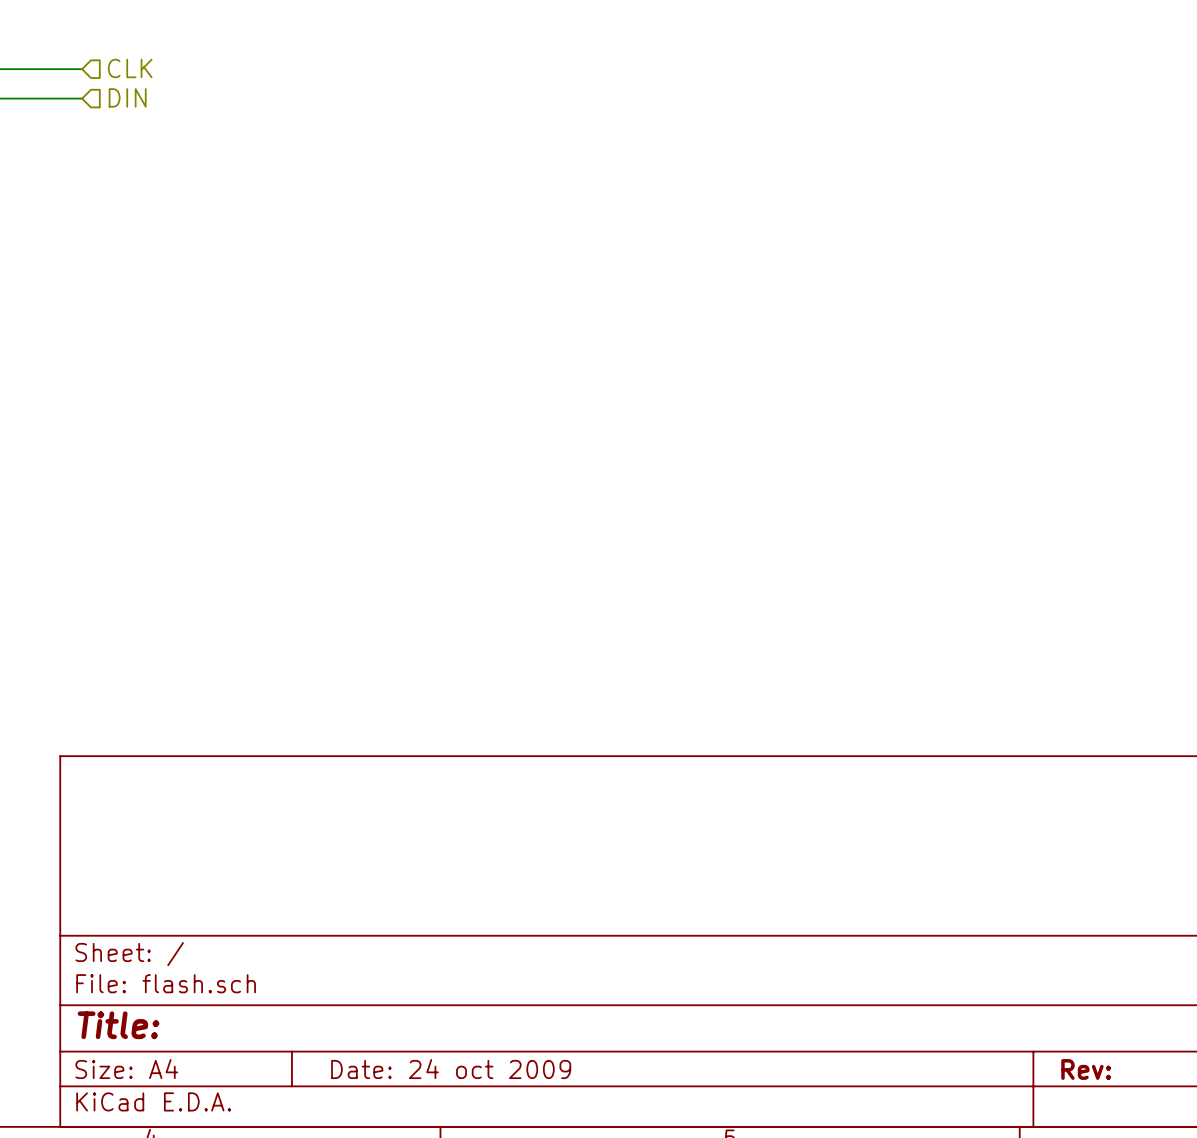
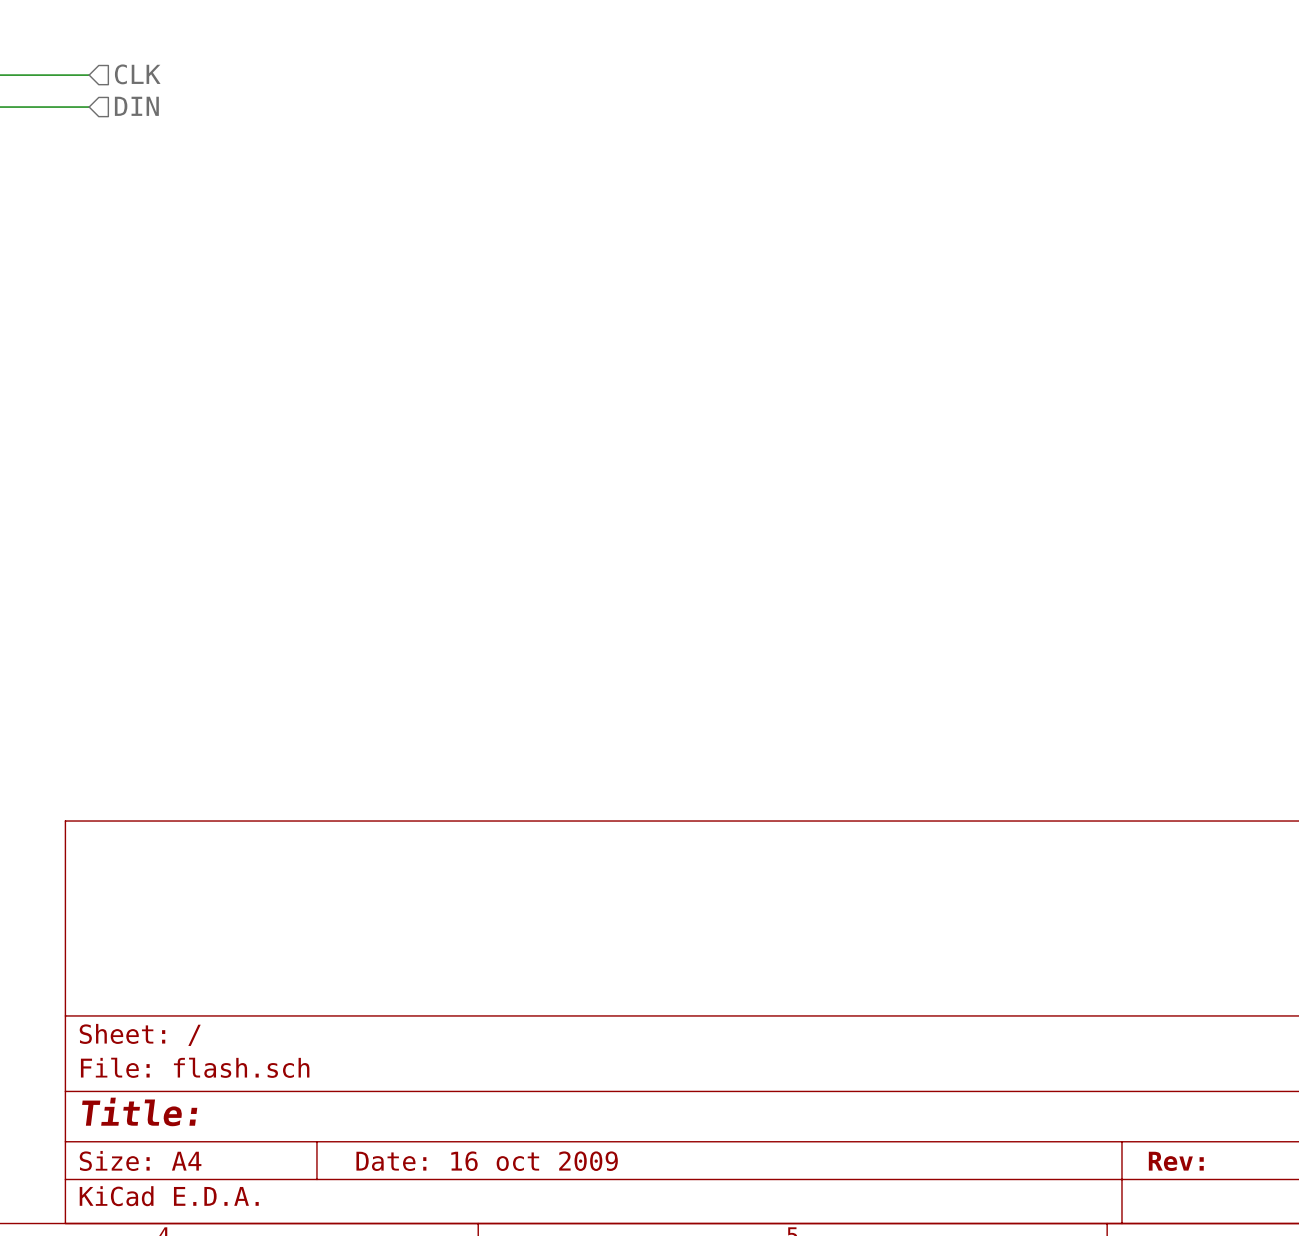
title block: Date: 24 oct 2009 (451, 1069) -> Date: 16 oct 2009 (487, 1161)

